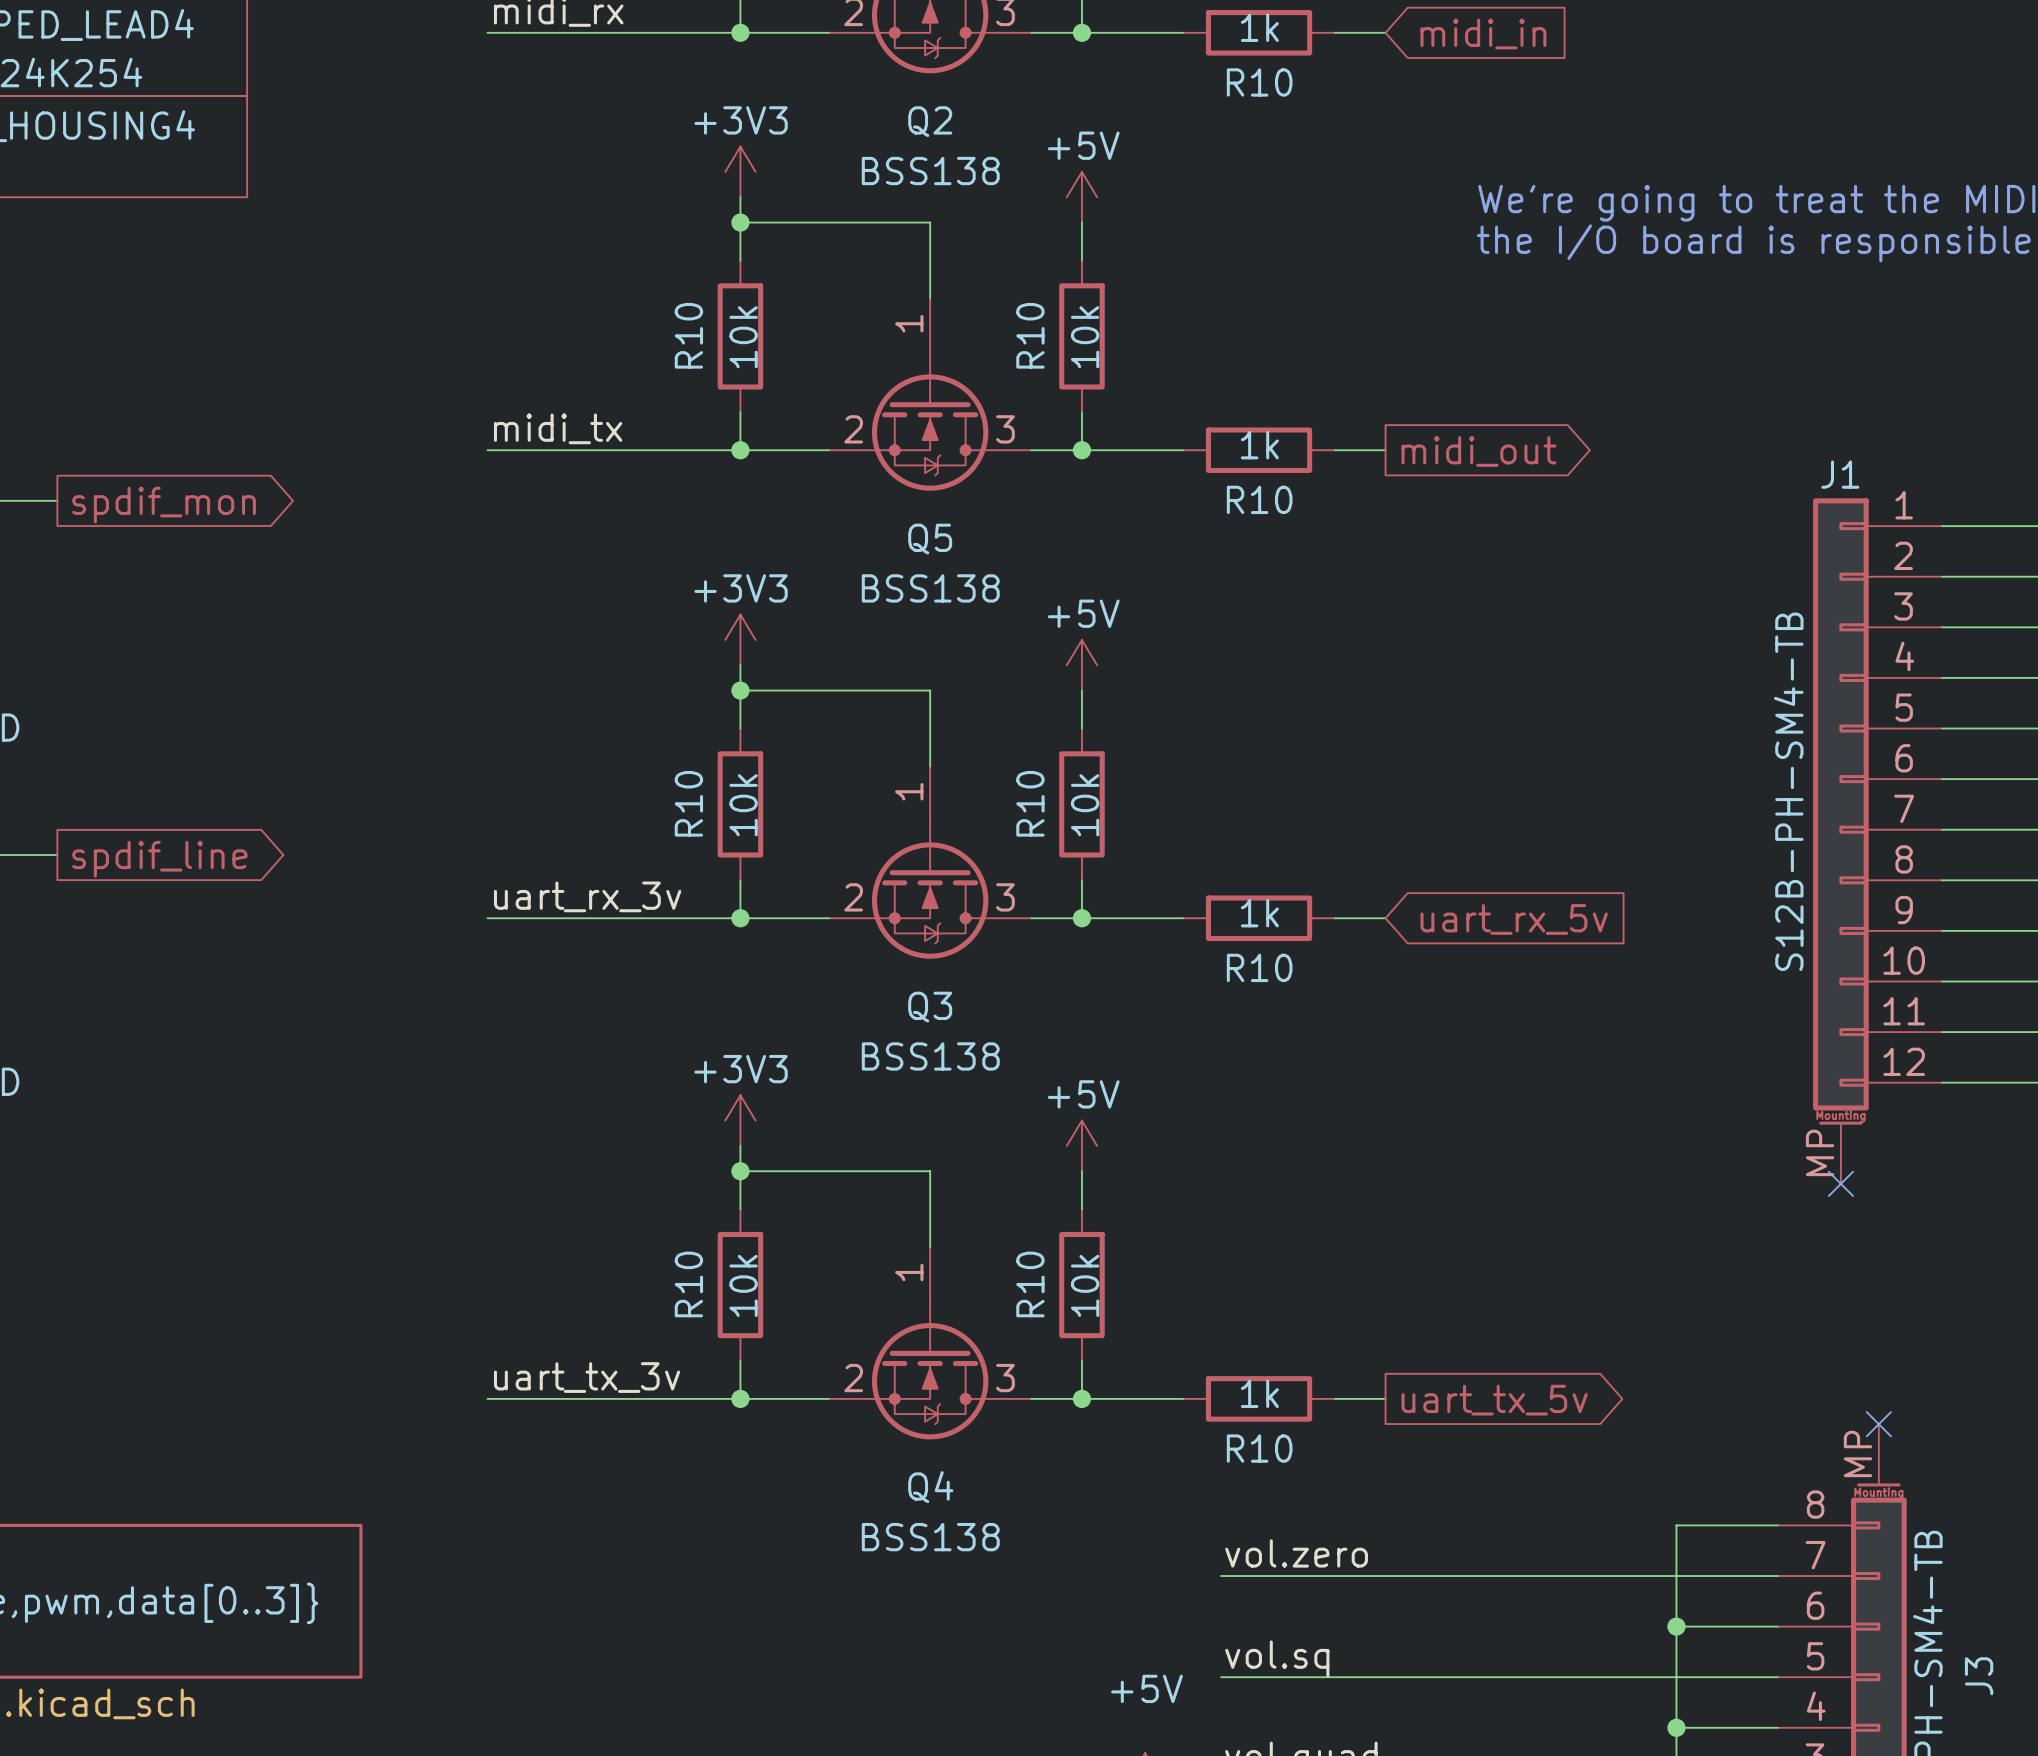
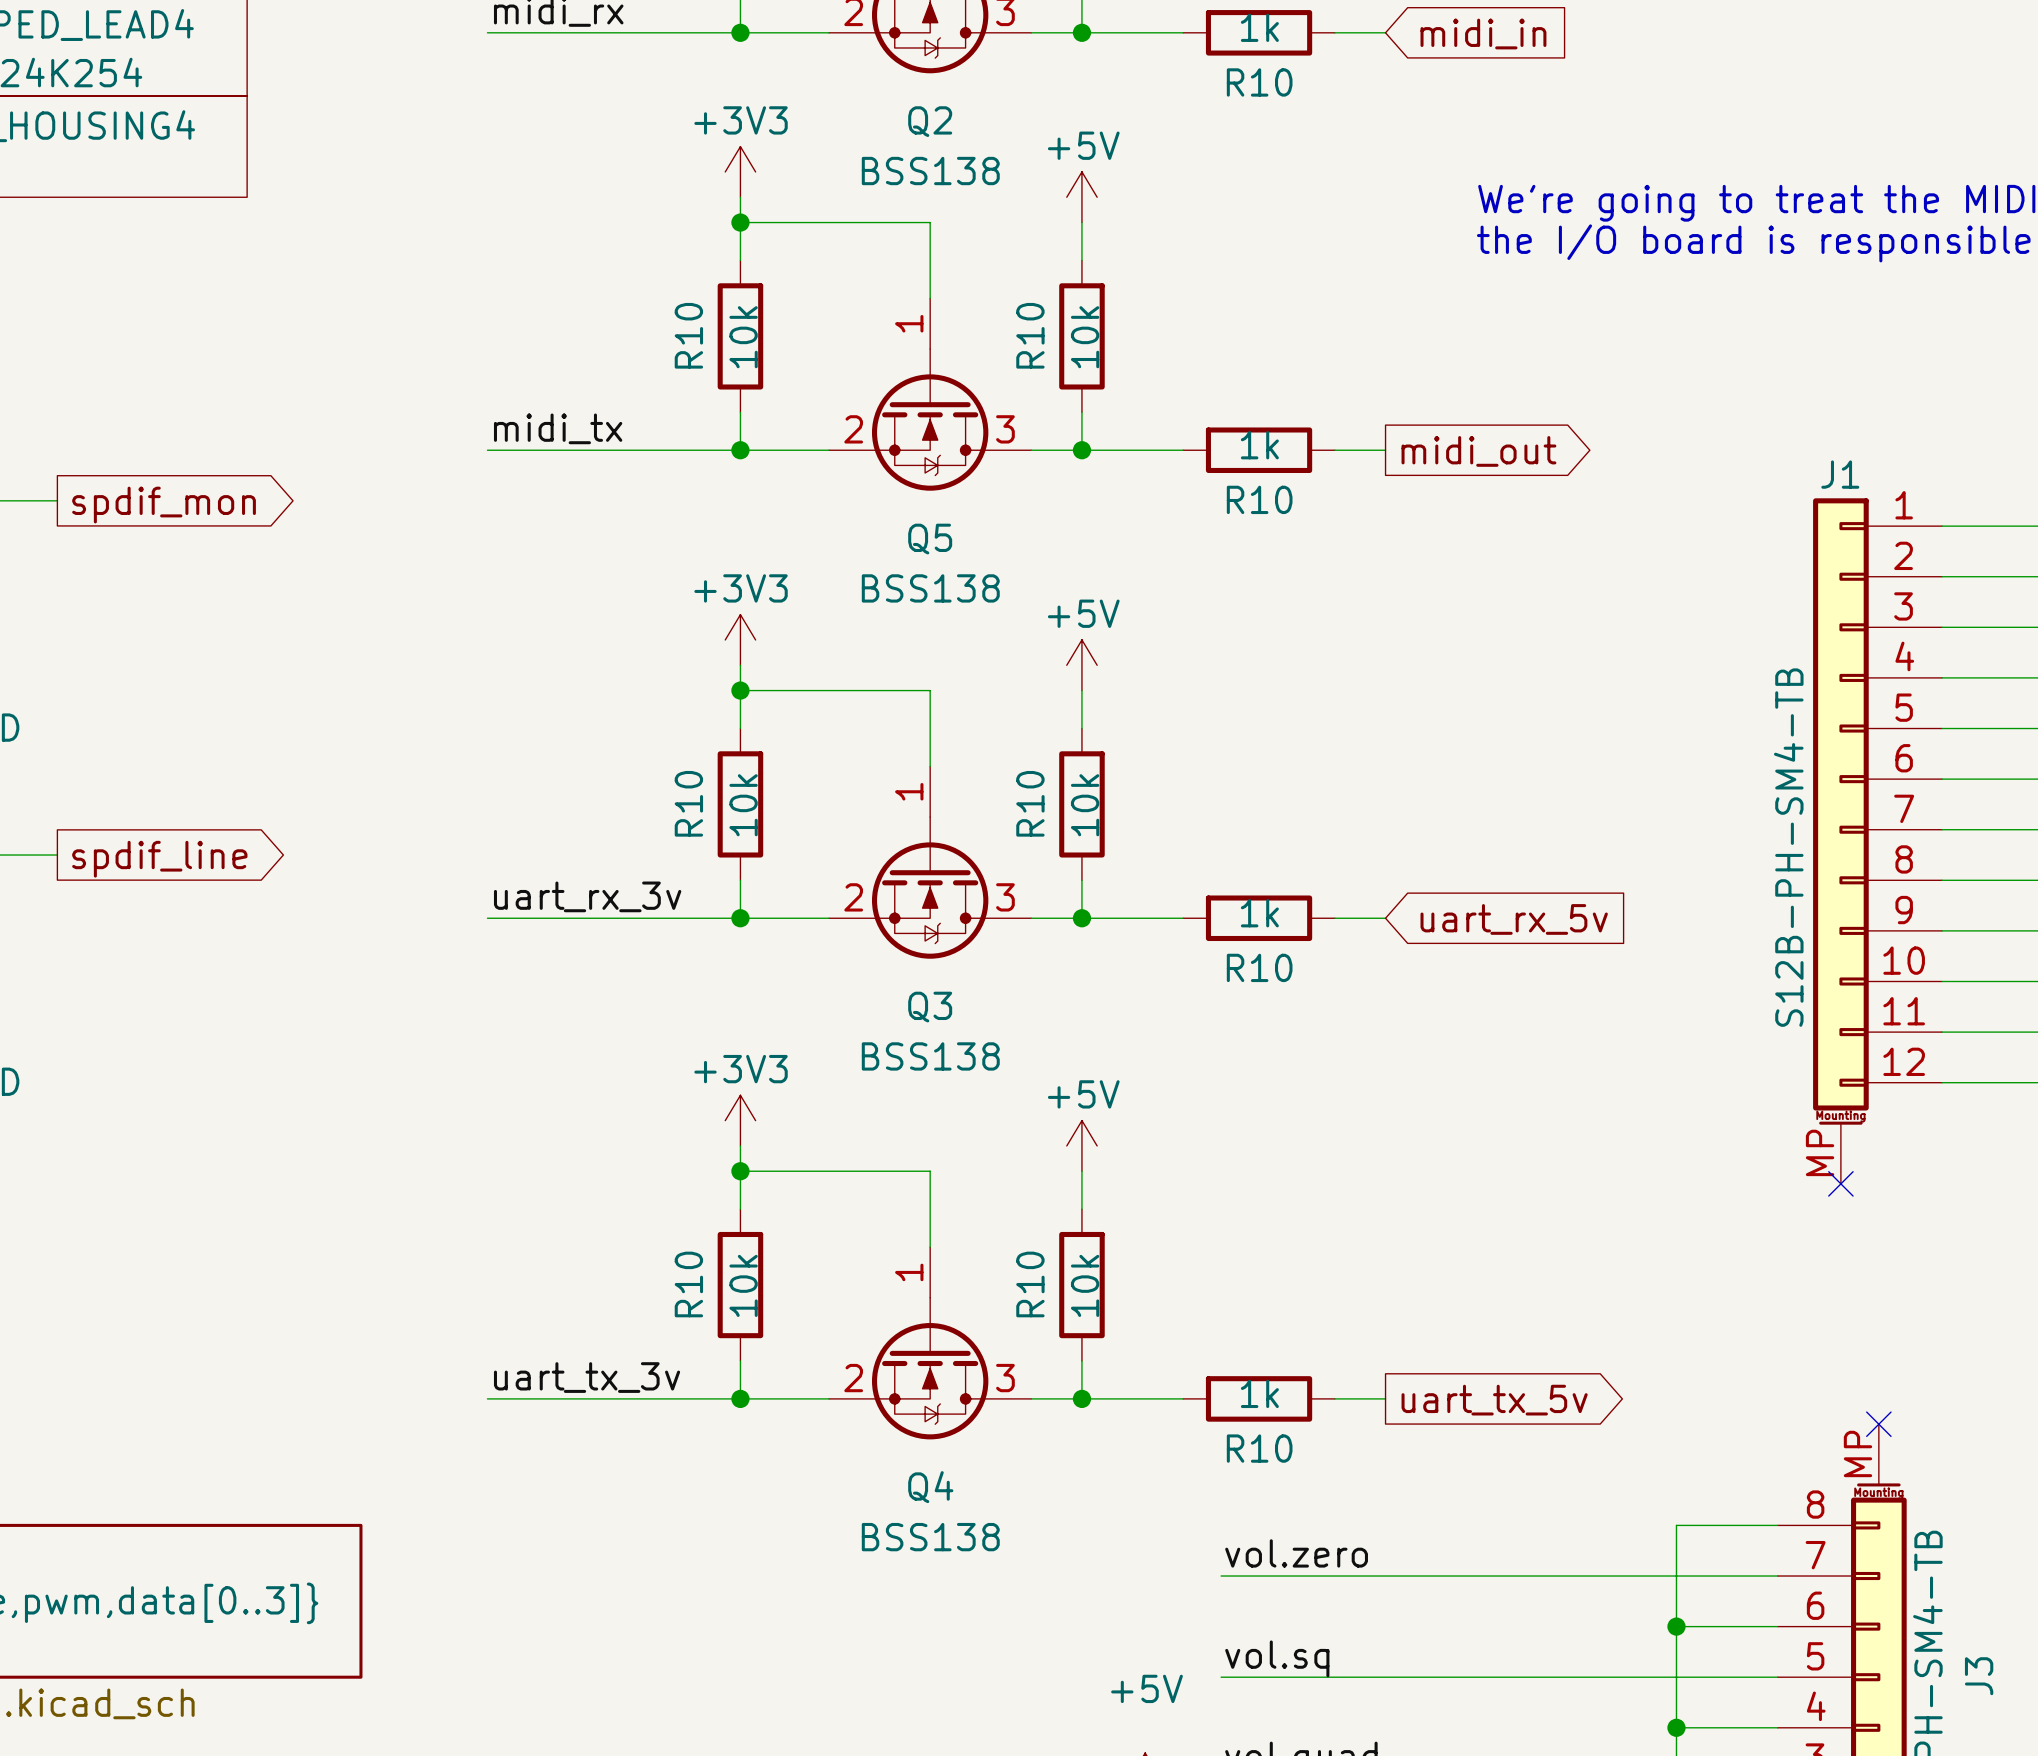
J1 value position: S12B-PH-SM4-TB (1788, 791) -> S12B-PH-SM4-TB (1788, 847)

